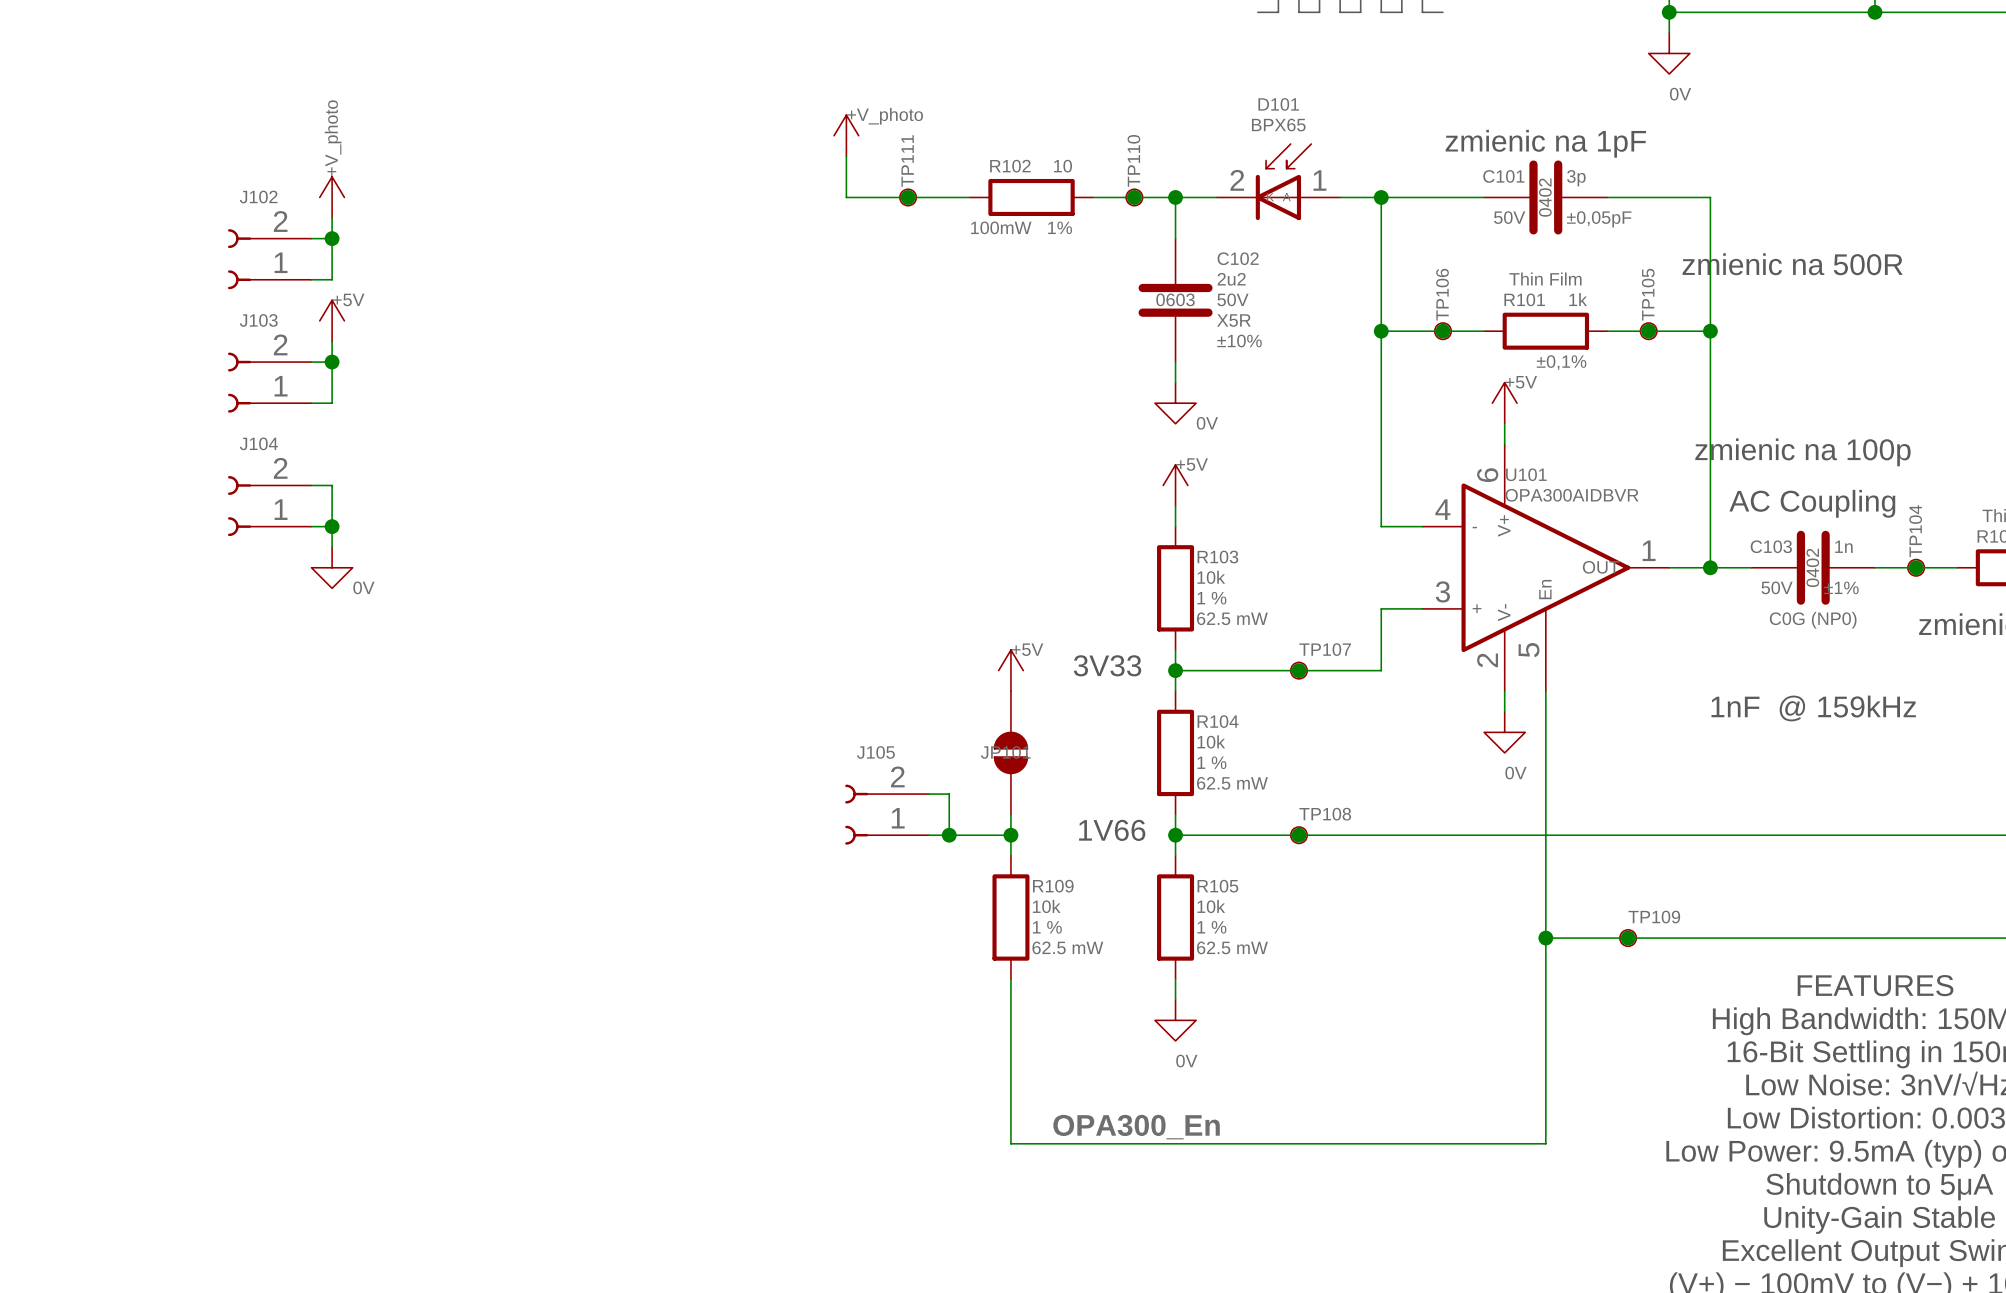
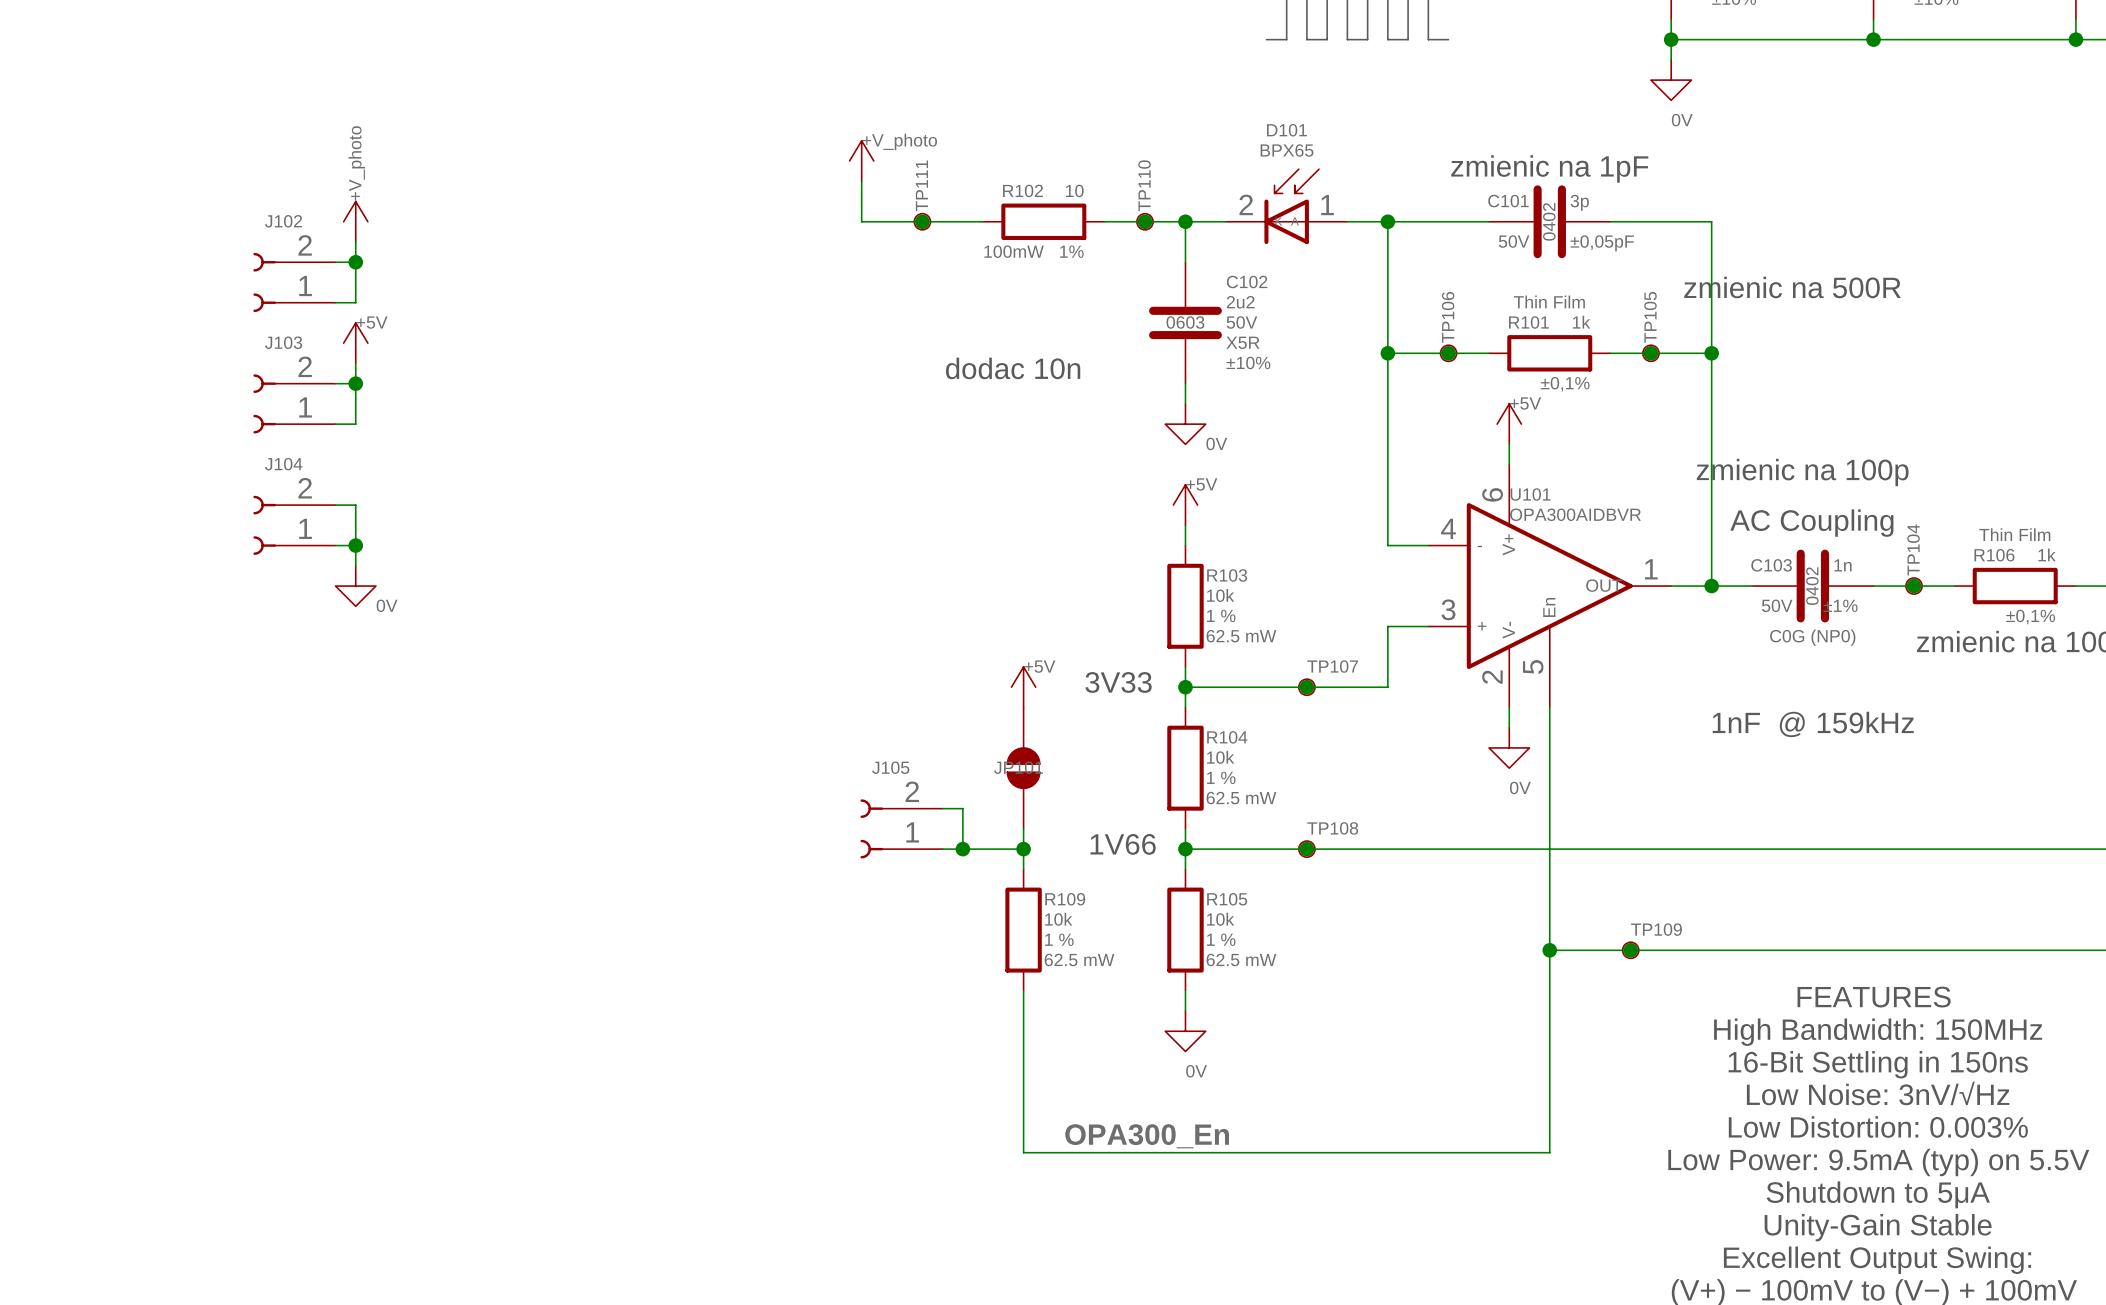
text: none -> dodac 10n (1013, 368)

